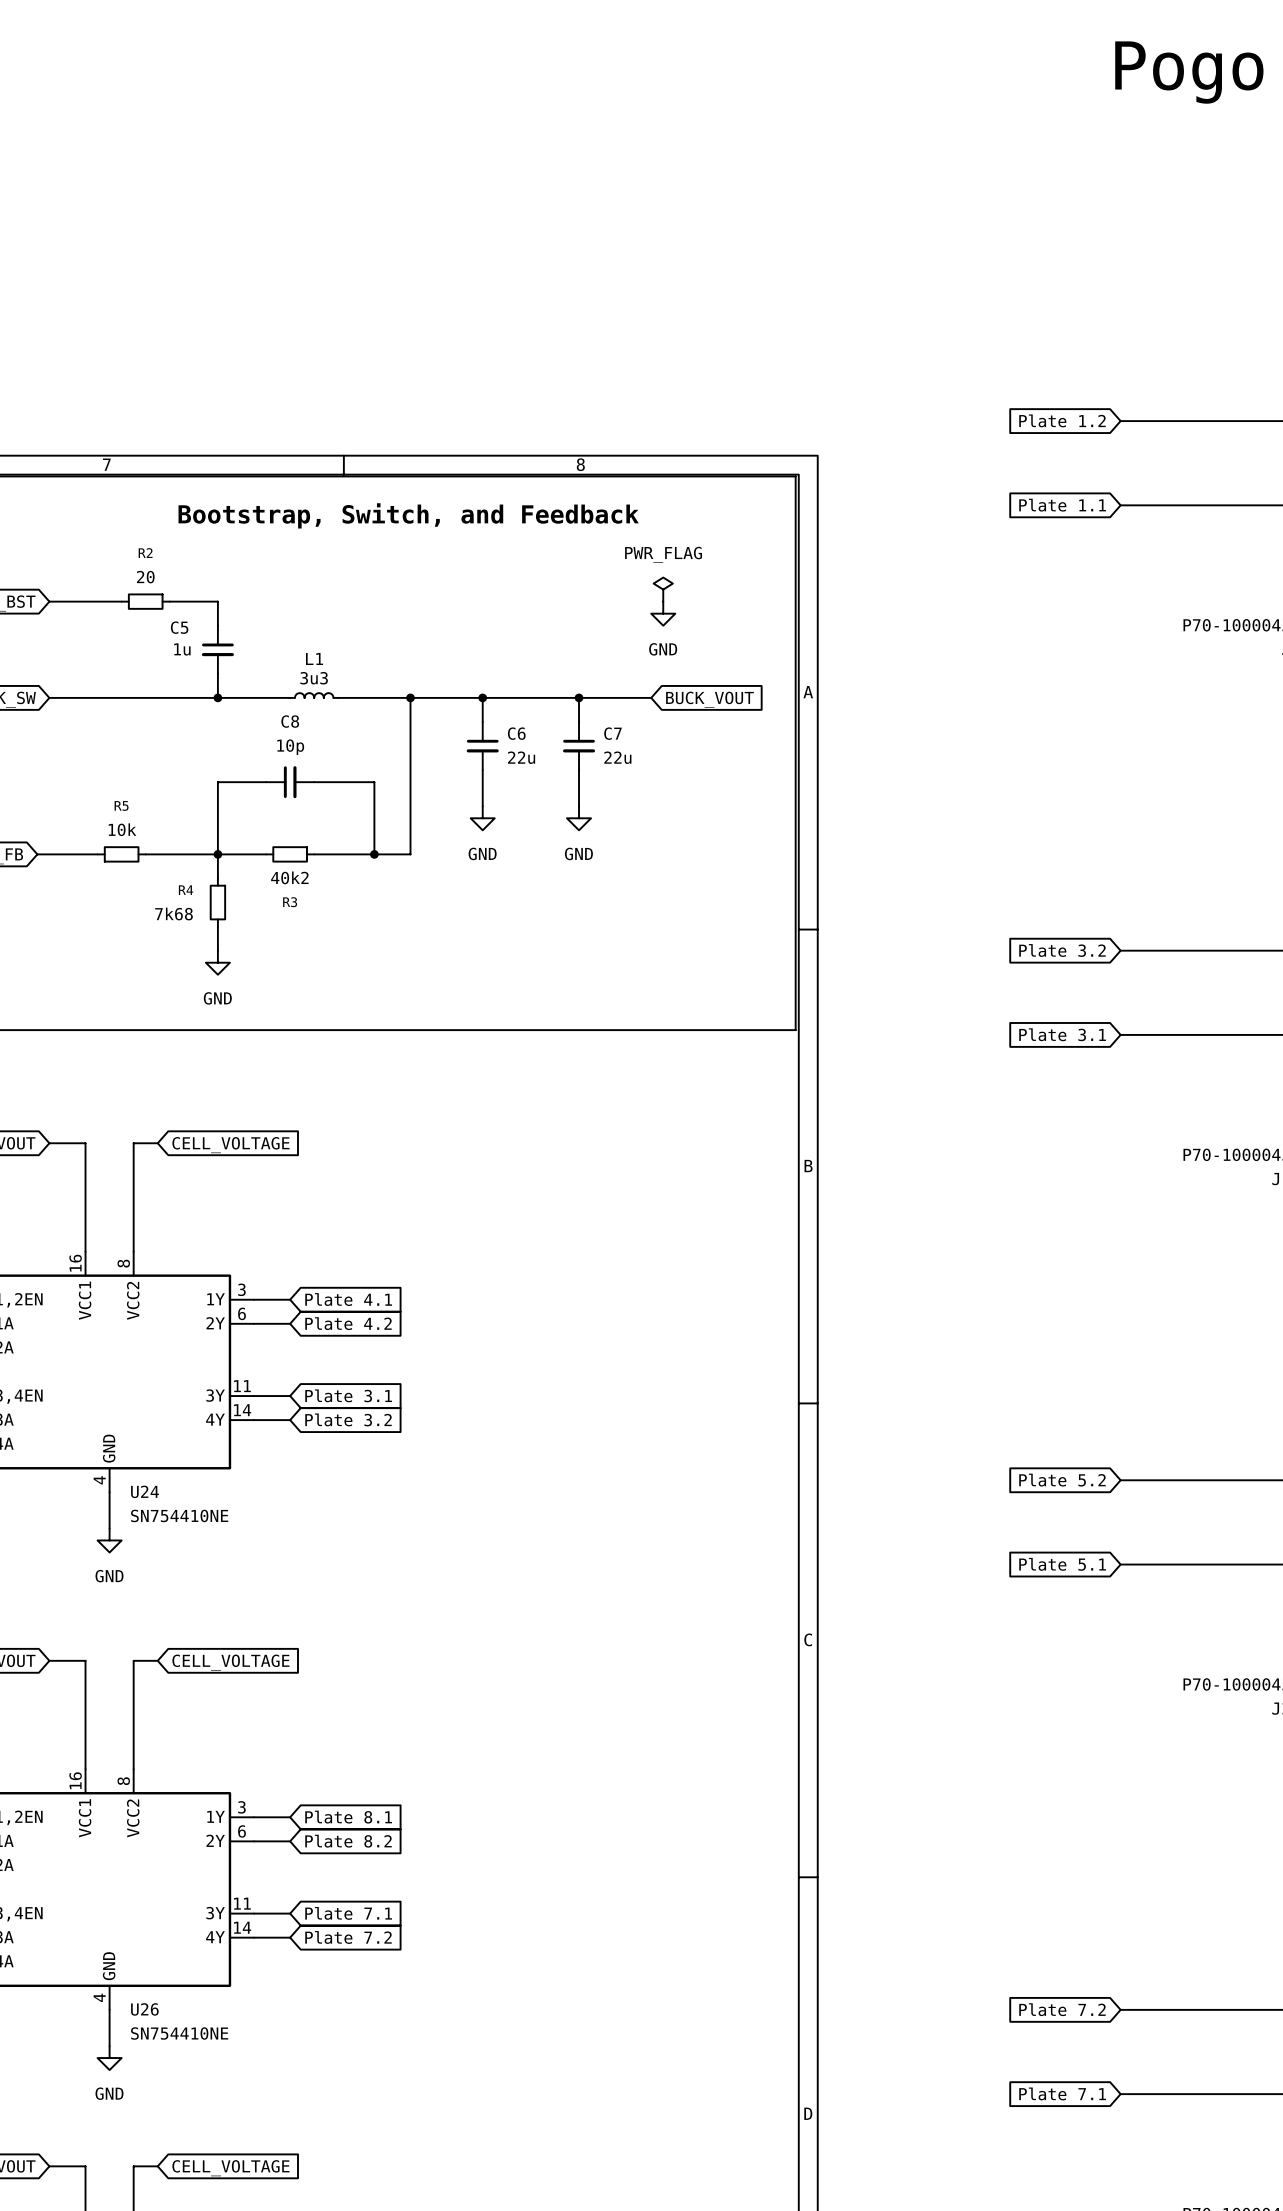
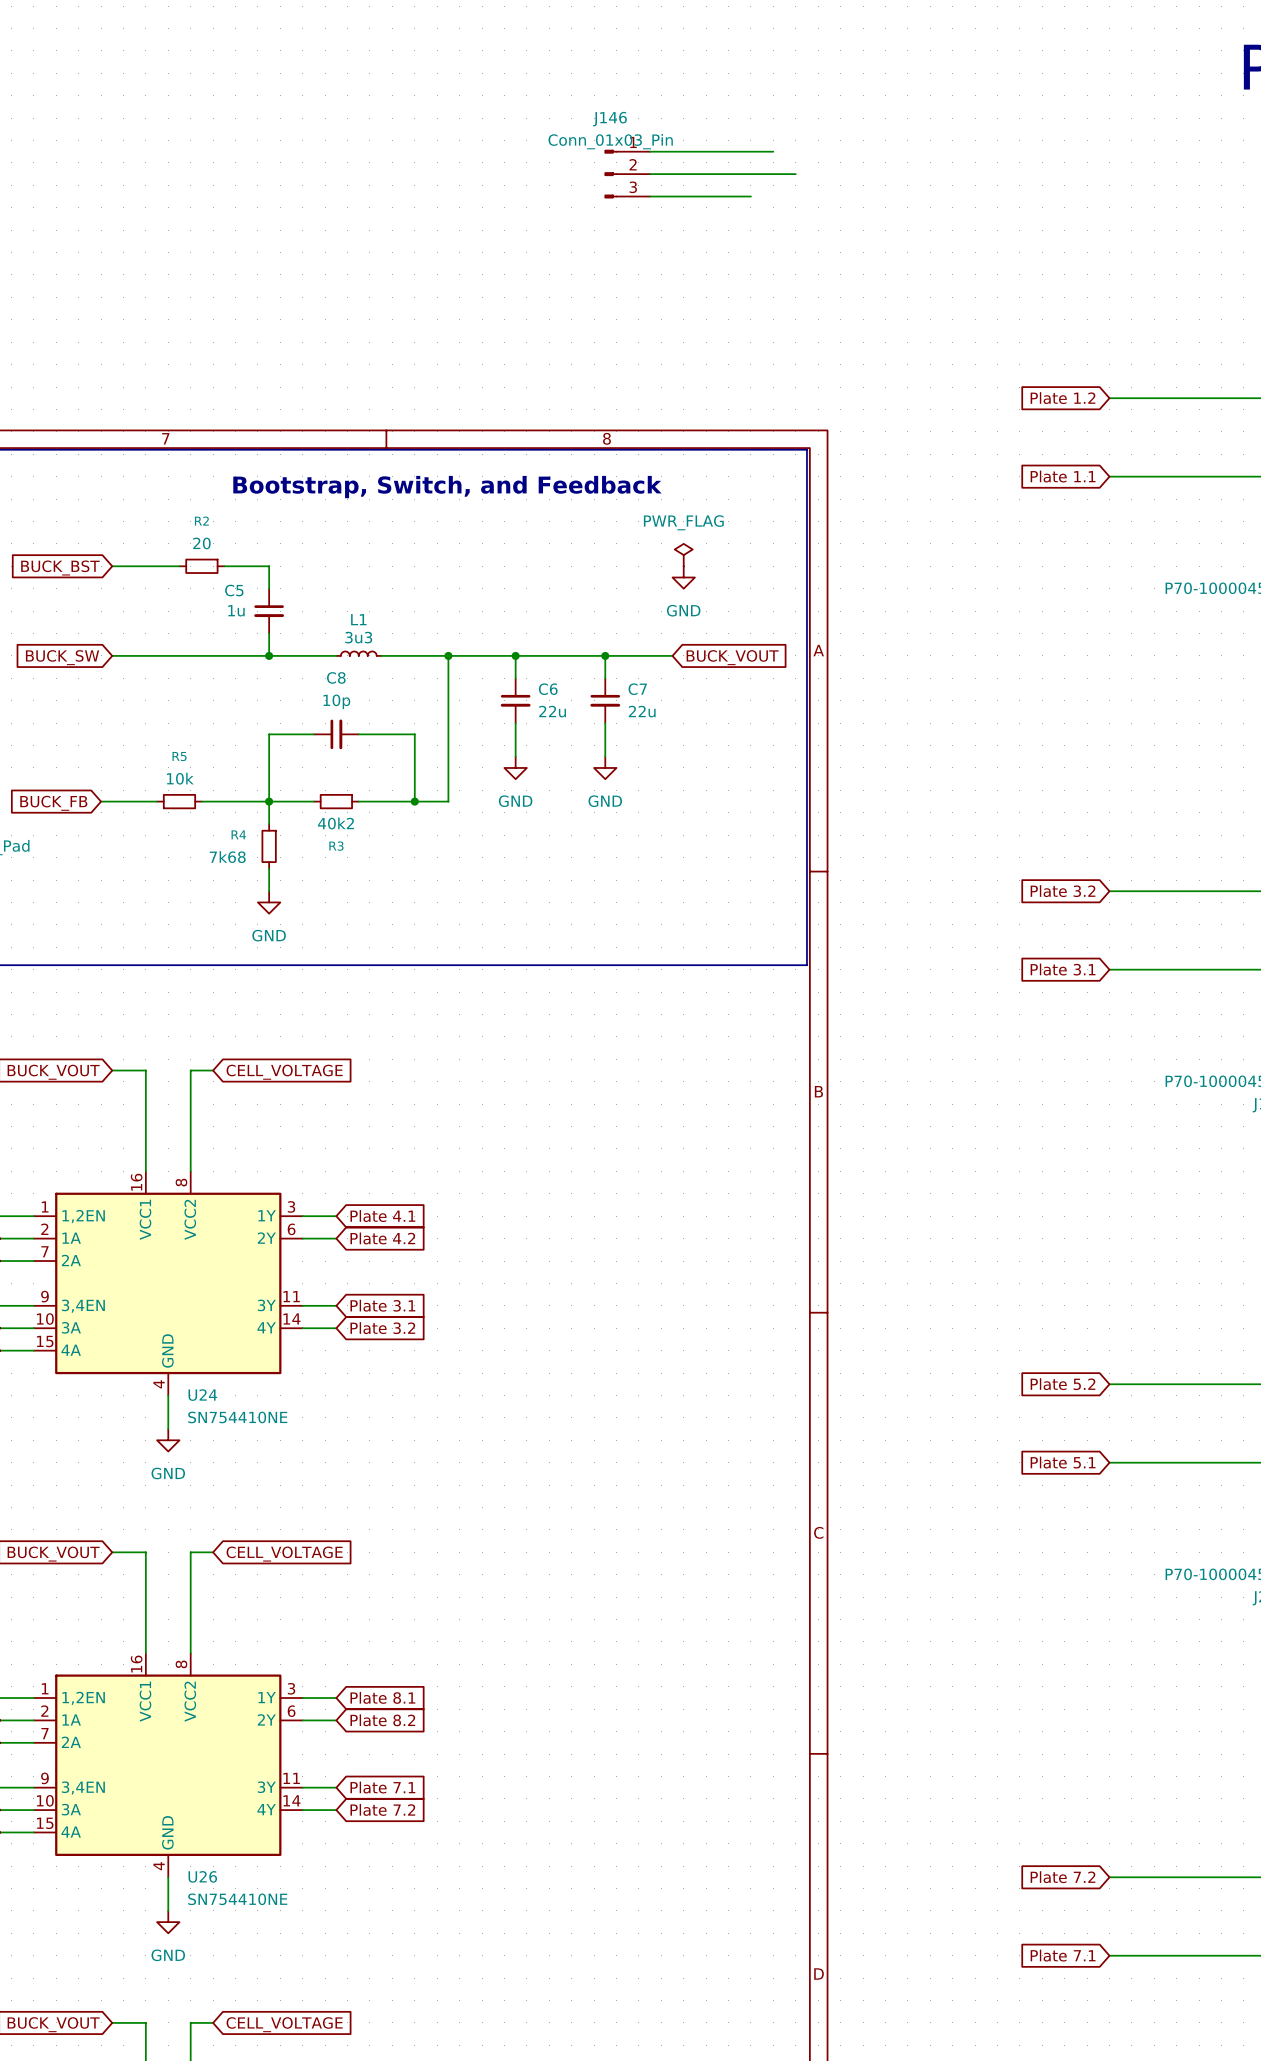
wire: none -> (650, 151) (773, 151)
J146: none -> Conn_01x03_Pin (627, 174)
wire: none -> (650, 174) (795, 174)
wire: none -> (650, 196) (750, 196)

